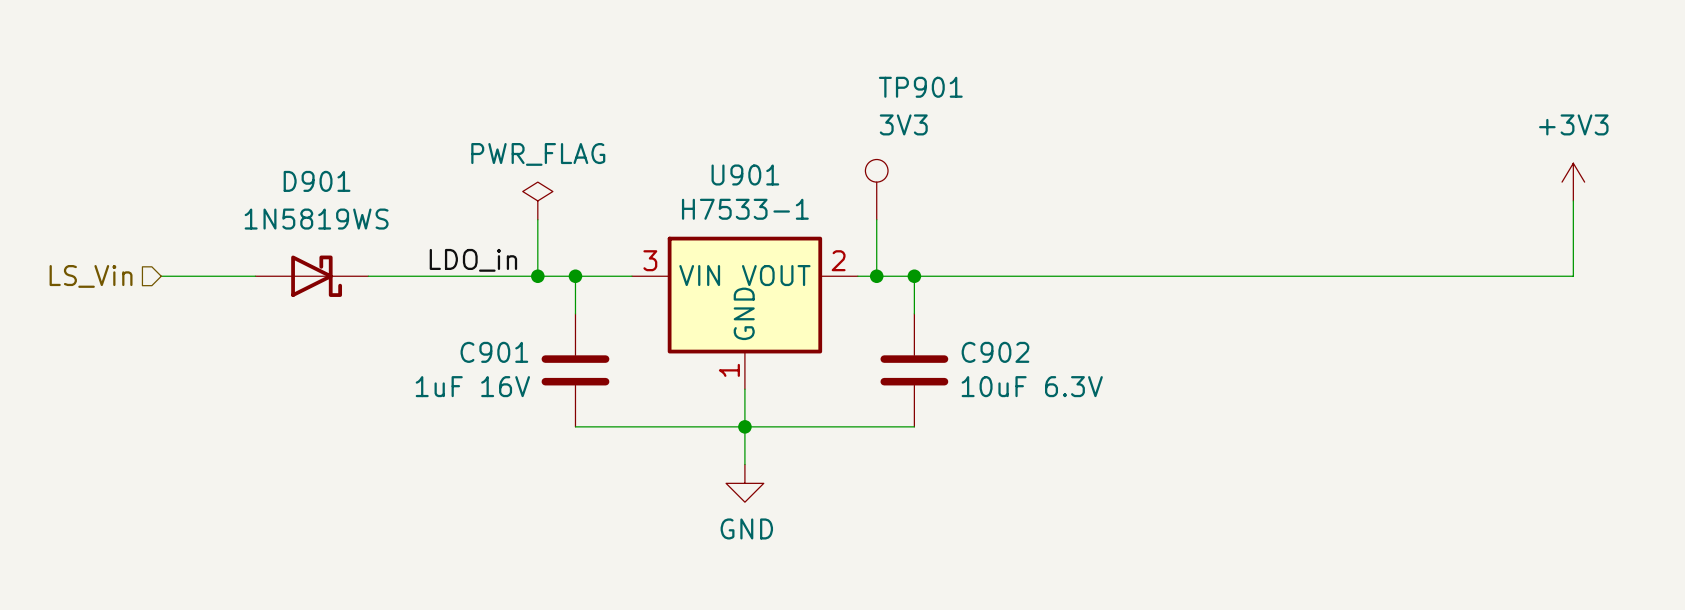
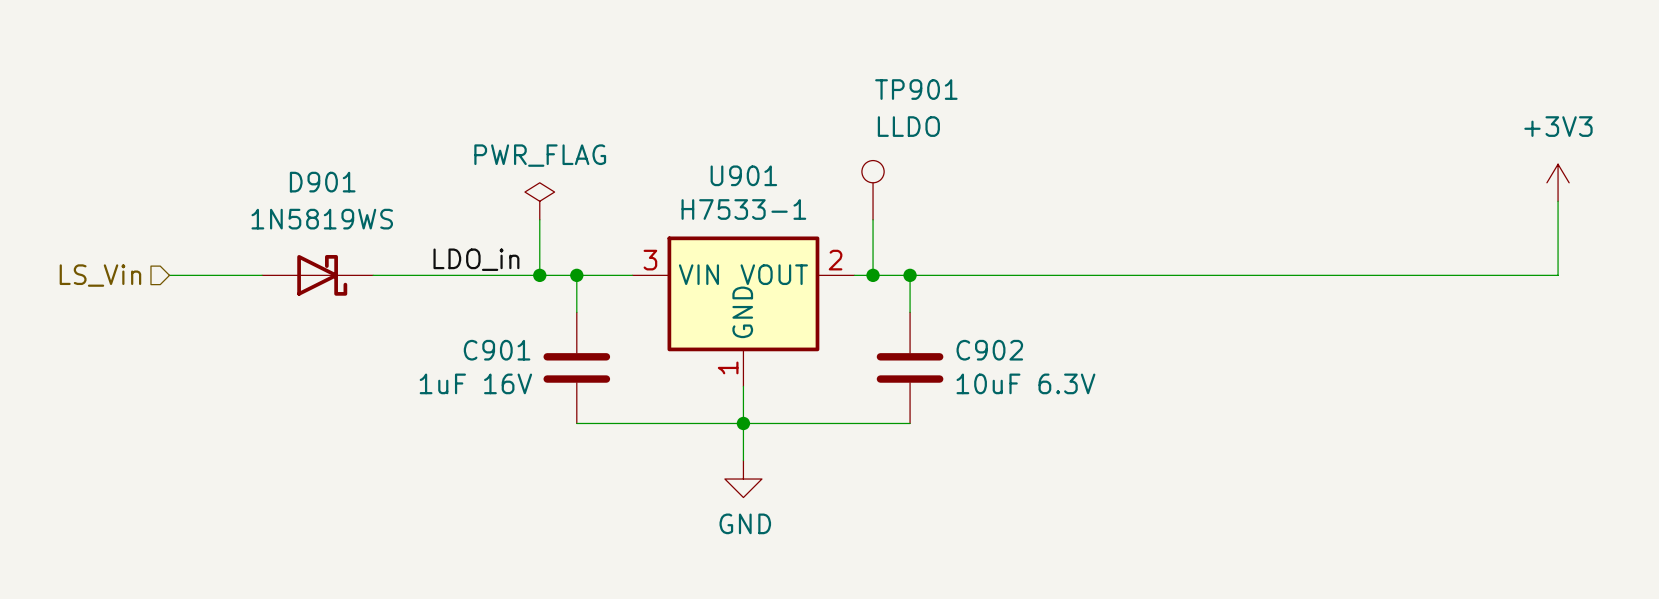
TP901 value: 3V3 (903, 124) -> LLDO (908, 126)

